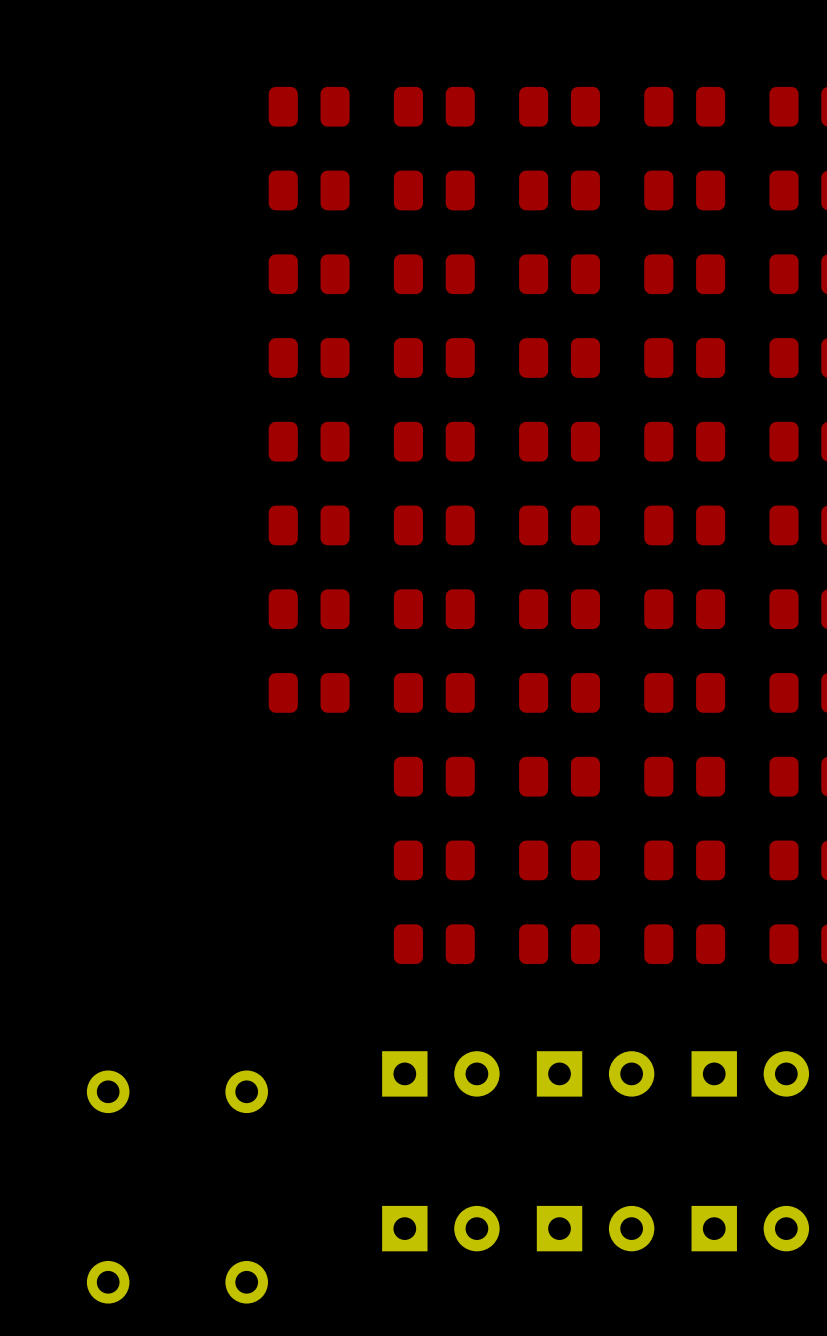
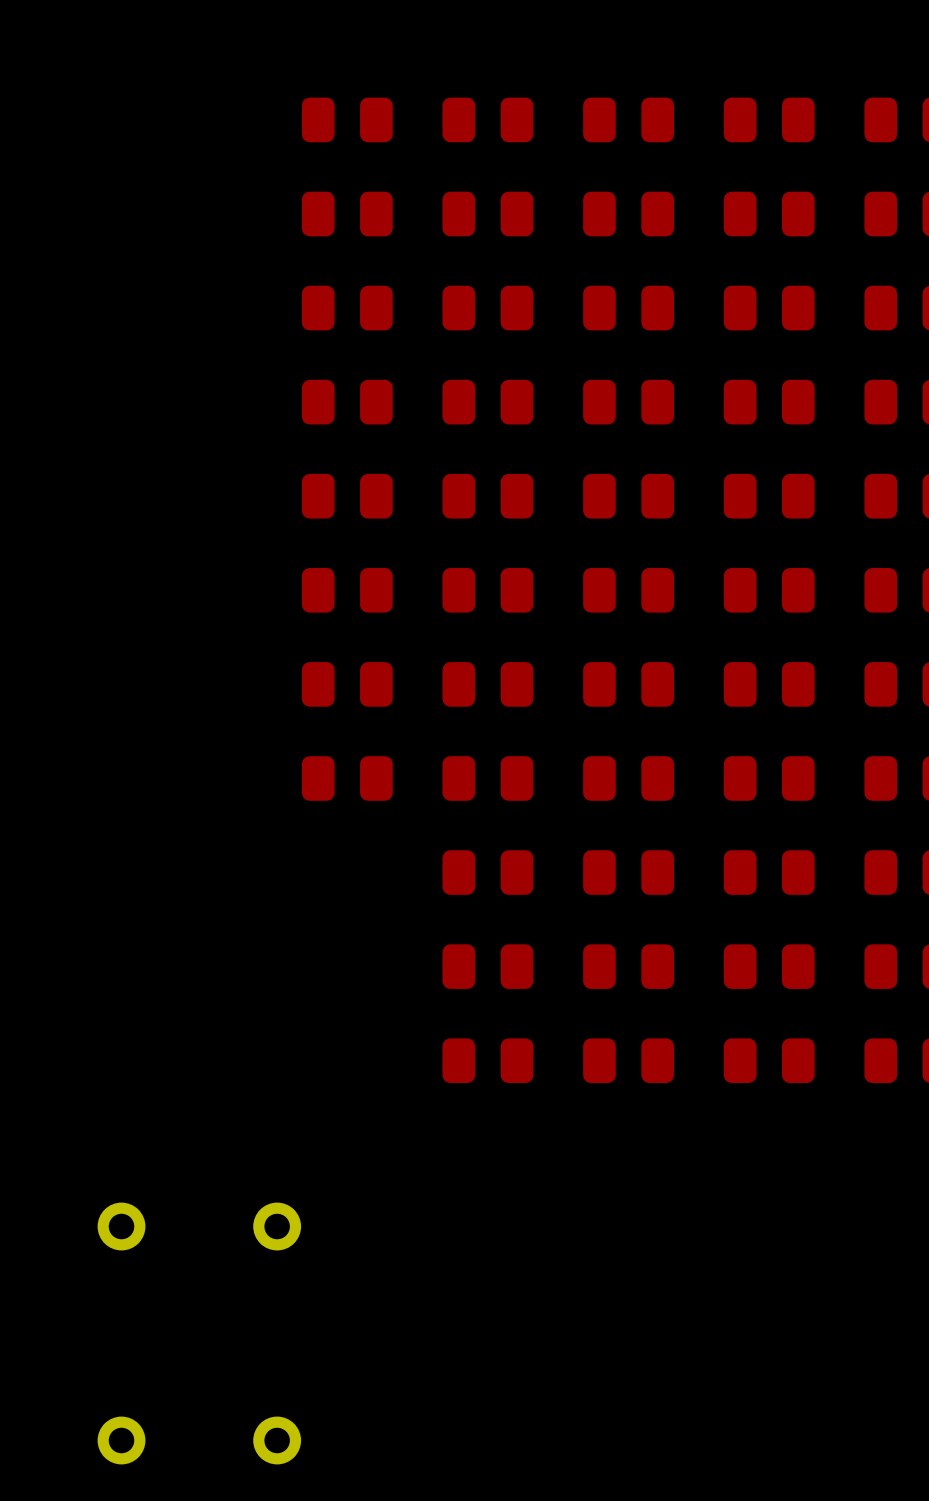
part: (440, 1073) -> none
part: (595, 1073) -> none
part: (750, 1073) -> none
part: (440, 1228) -> none
part: (595, 1228) -> none
part: (750, 1228) -> none

